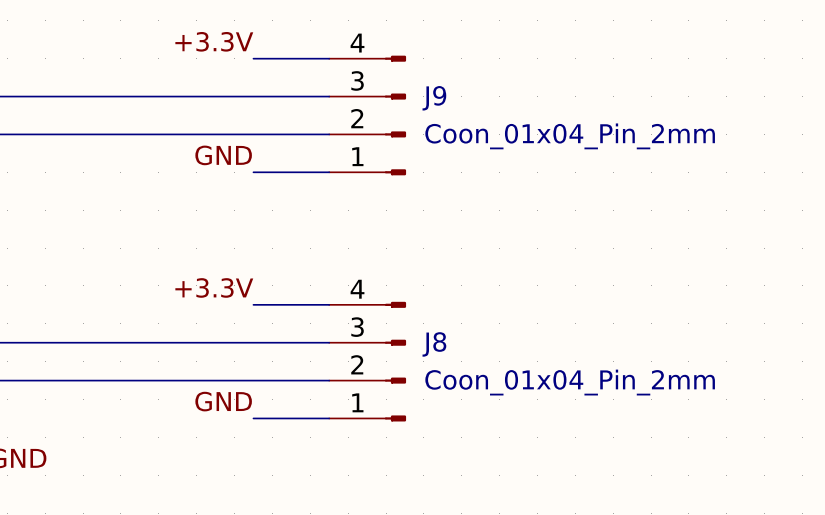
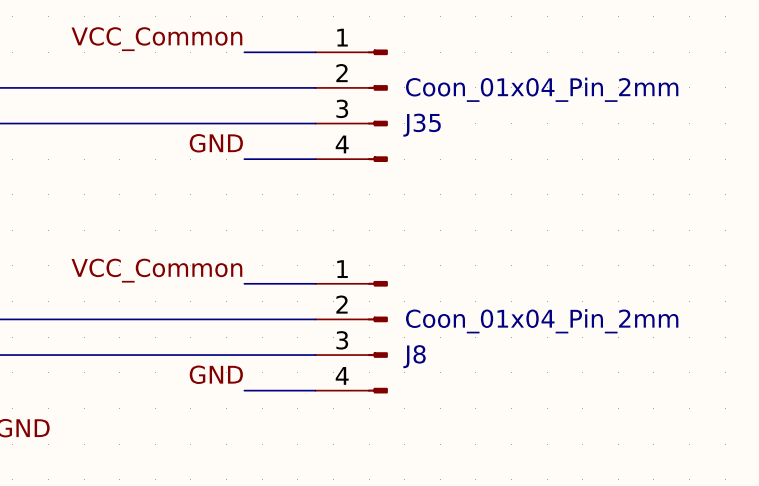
label: +3.3V (214, 41) -> VCC_Common (156, 39)
J9 name: J9 (434, 98) -> J35 (422, 125)
J9 flip: as is (395, 115) -> up-down (377, 105)
label: +3.3V (214, 287) -> VCC_Common (156, 270)
J8 flip: as is (395, 361) -> up-down (377, 337)

